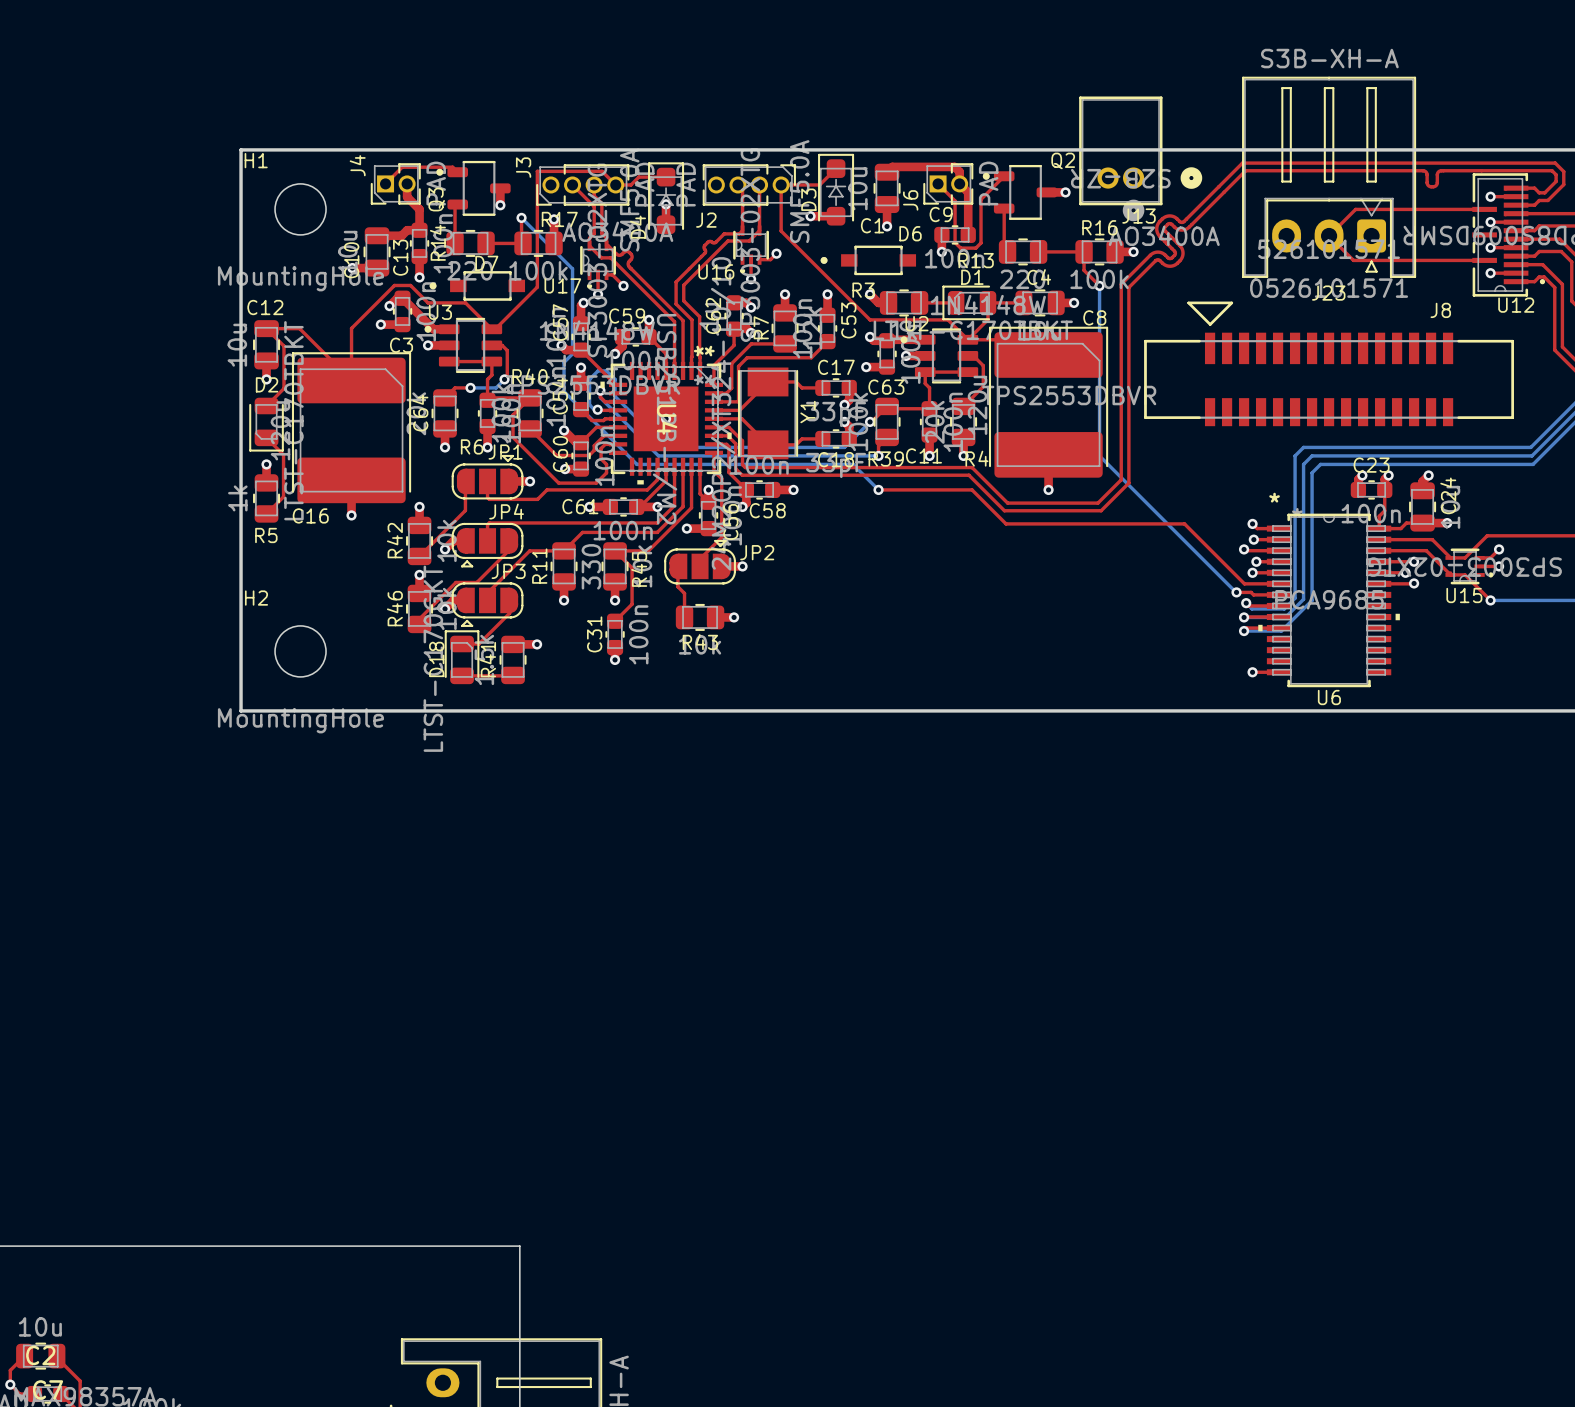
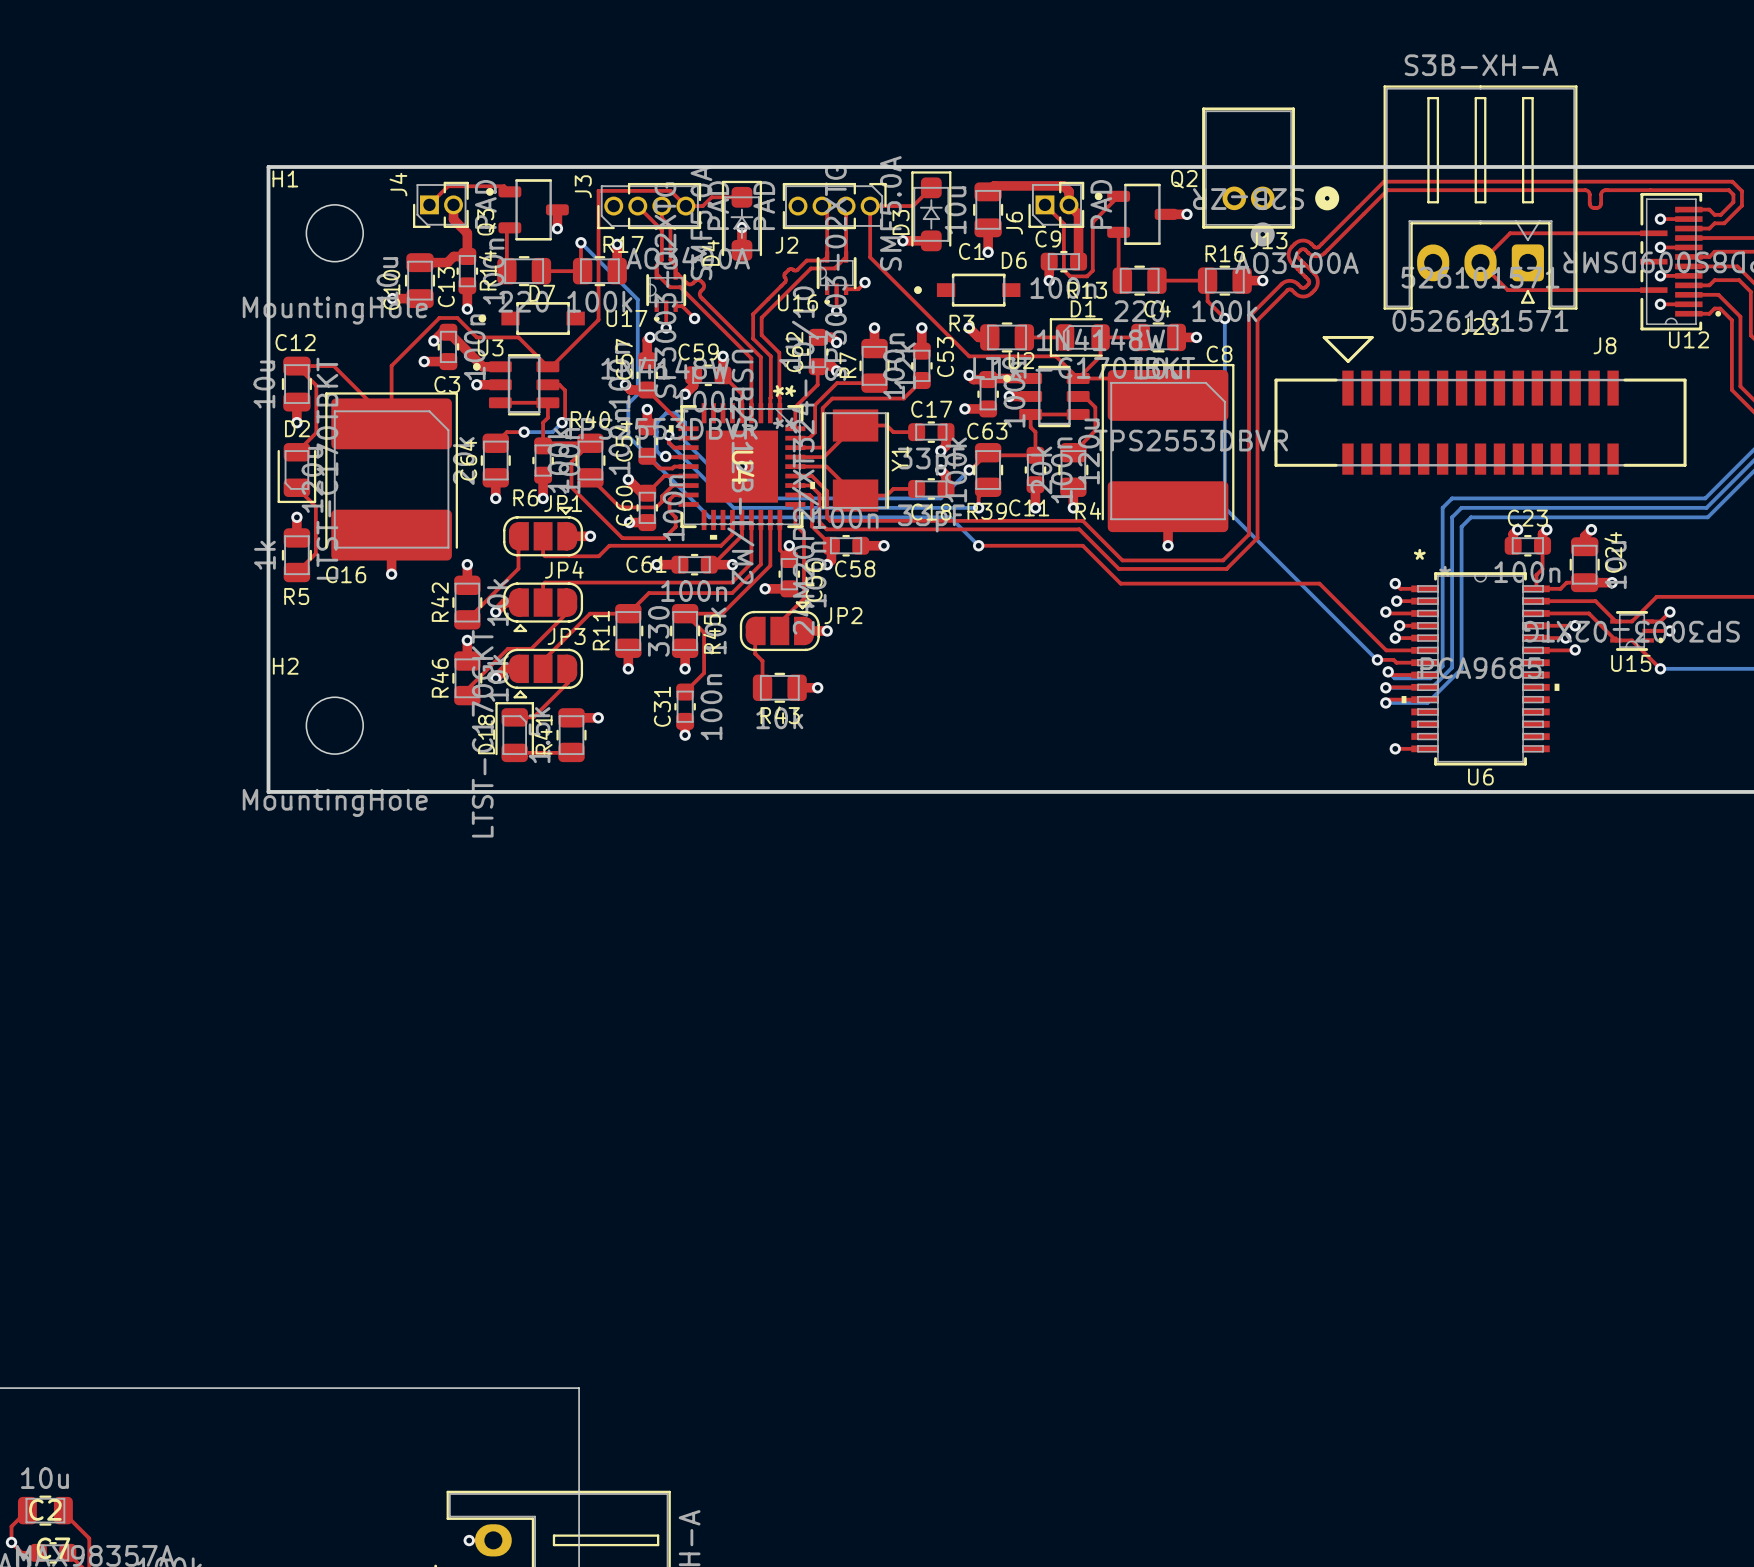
via: none -> (469, 1540)

